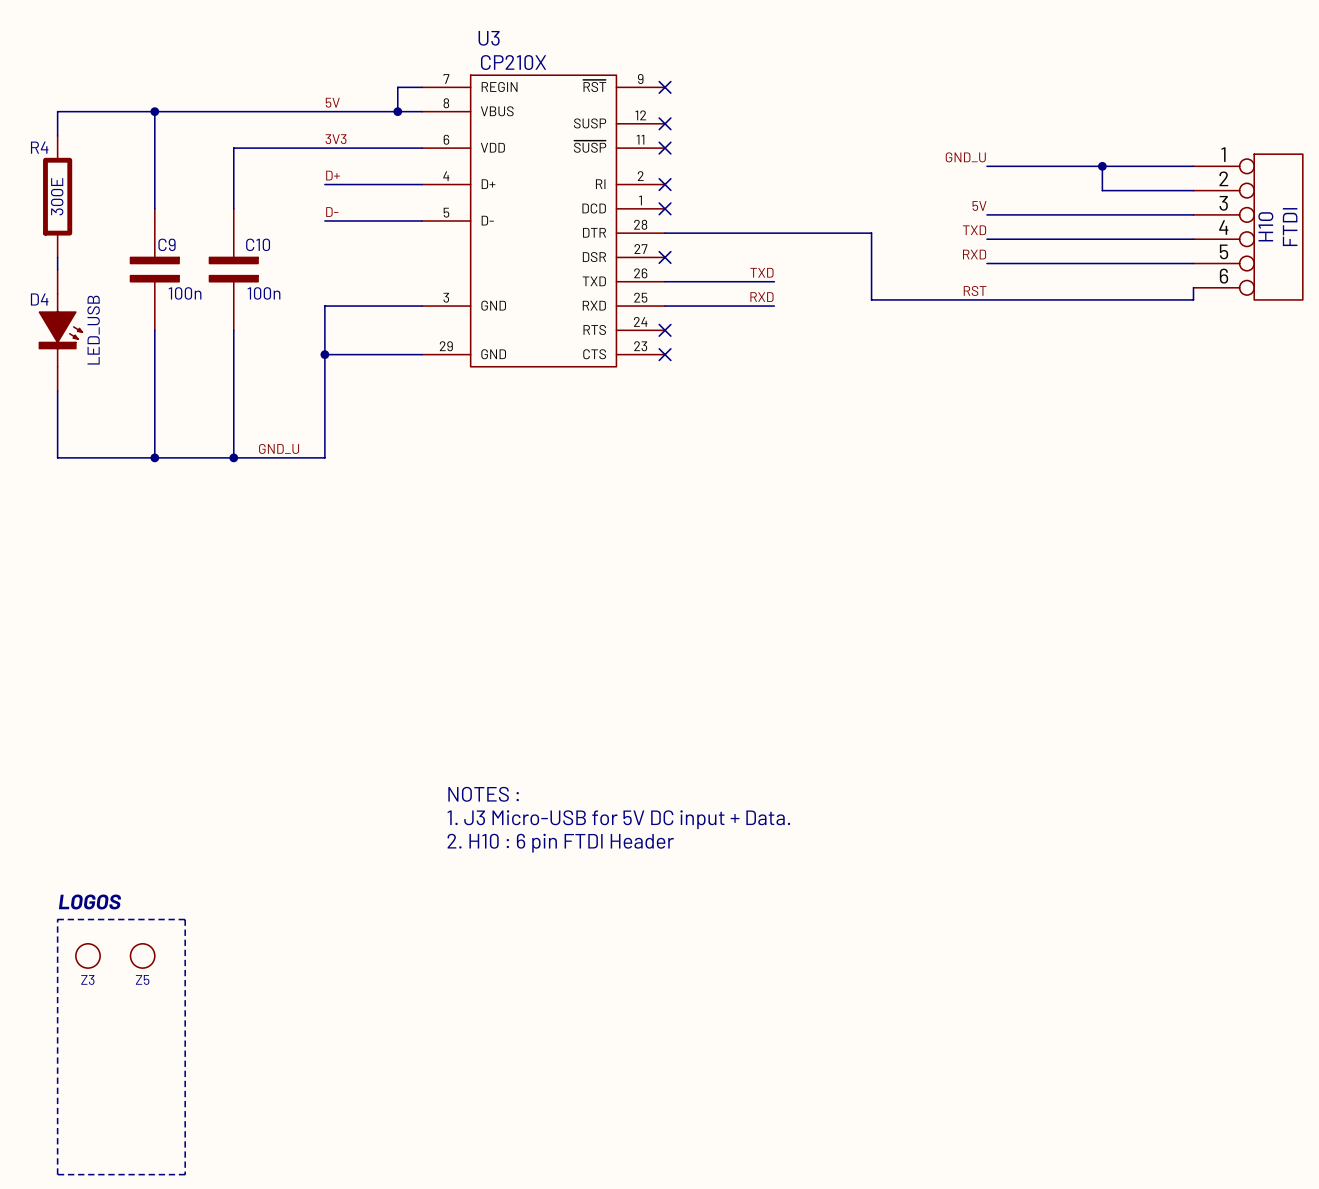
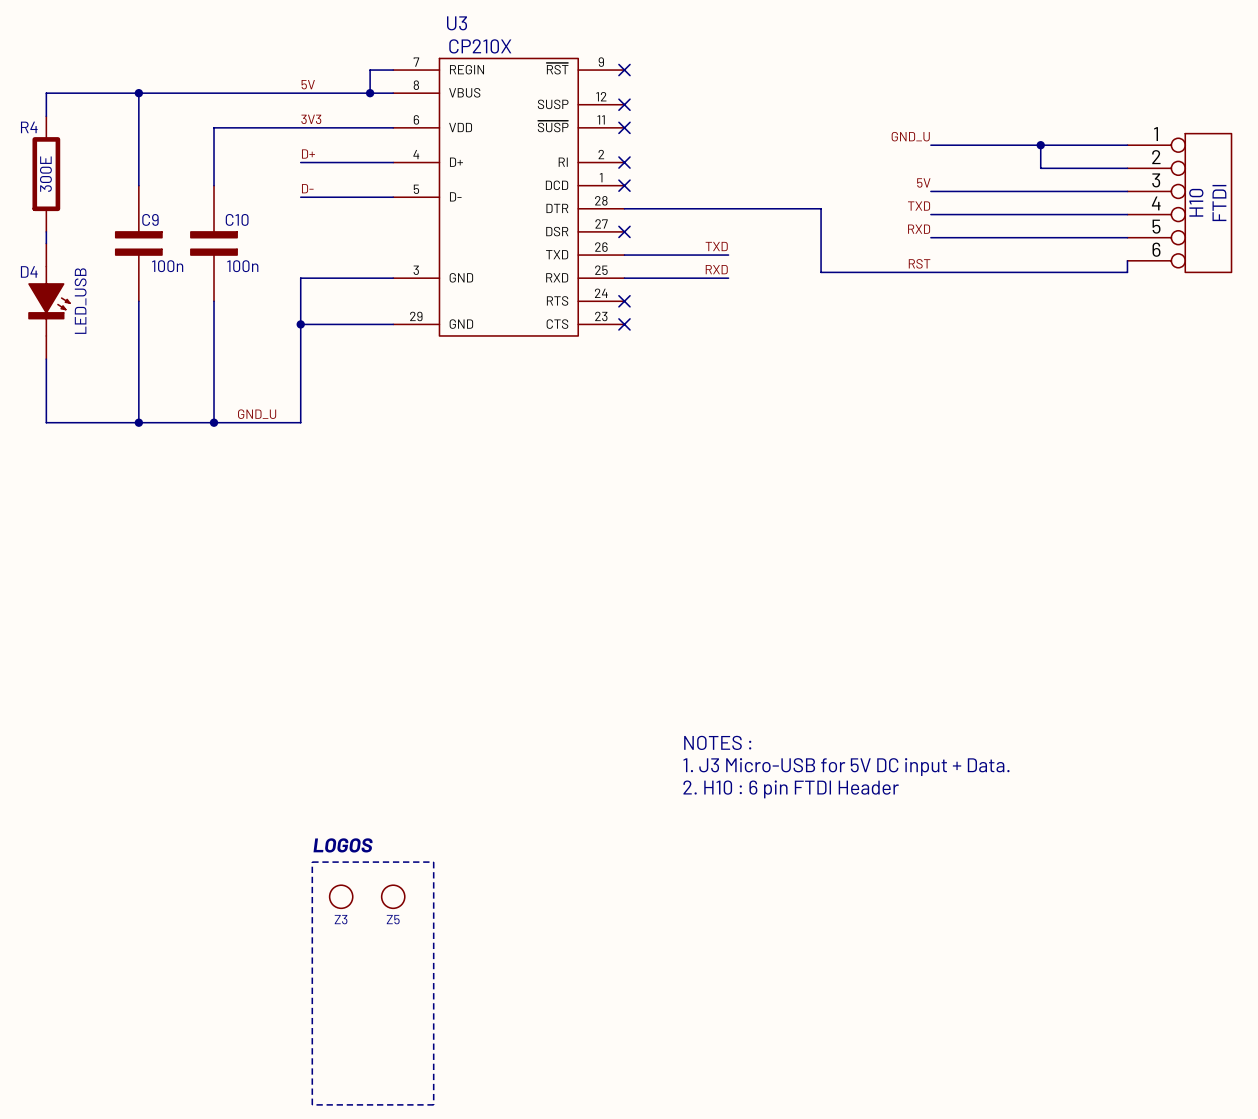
text: NOTES : (483, 794) -> none
text: none -> NOTES : (717, 742)
text: 1. J3 Micro-USB for 5V DC input + Data. (618, 819) -> none
text: none -> 1. J3 Micro-USB for 5V DC input + Data. (846, 767)
text: 2. H10 : 6 pin FTDI Header (560, 843) -> none
text: none -> 2. H10 : 6 pin FTDI Header (791, 789)
text: LOGOS (90, 902) -> none
text: none -> LOGOS (343, 845)
line: (57, 919) (185, 919) (185, 1174) (57, 1174) (57, 919) -> none
line: none -> (312, 862) (433, 862) (433, 1104) (312, 1104) (312, 862)
Z3 position: (87, 955) -> (341, 896)
Z5 position: (142, 955) -> (393, 896)

